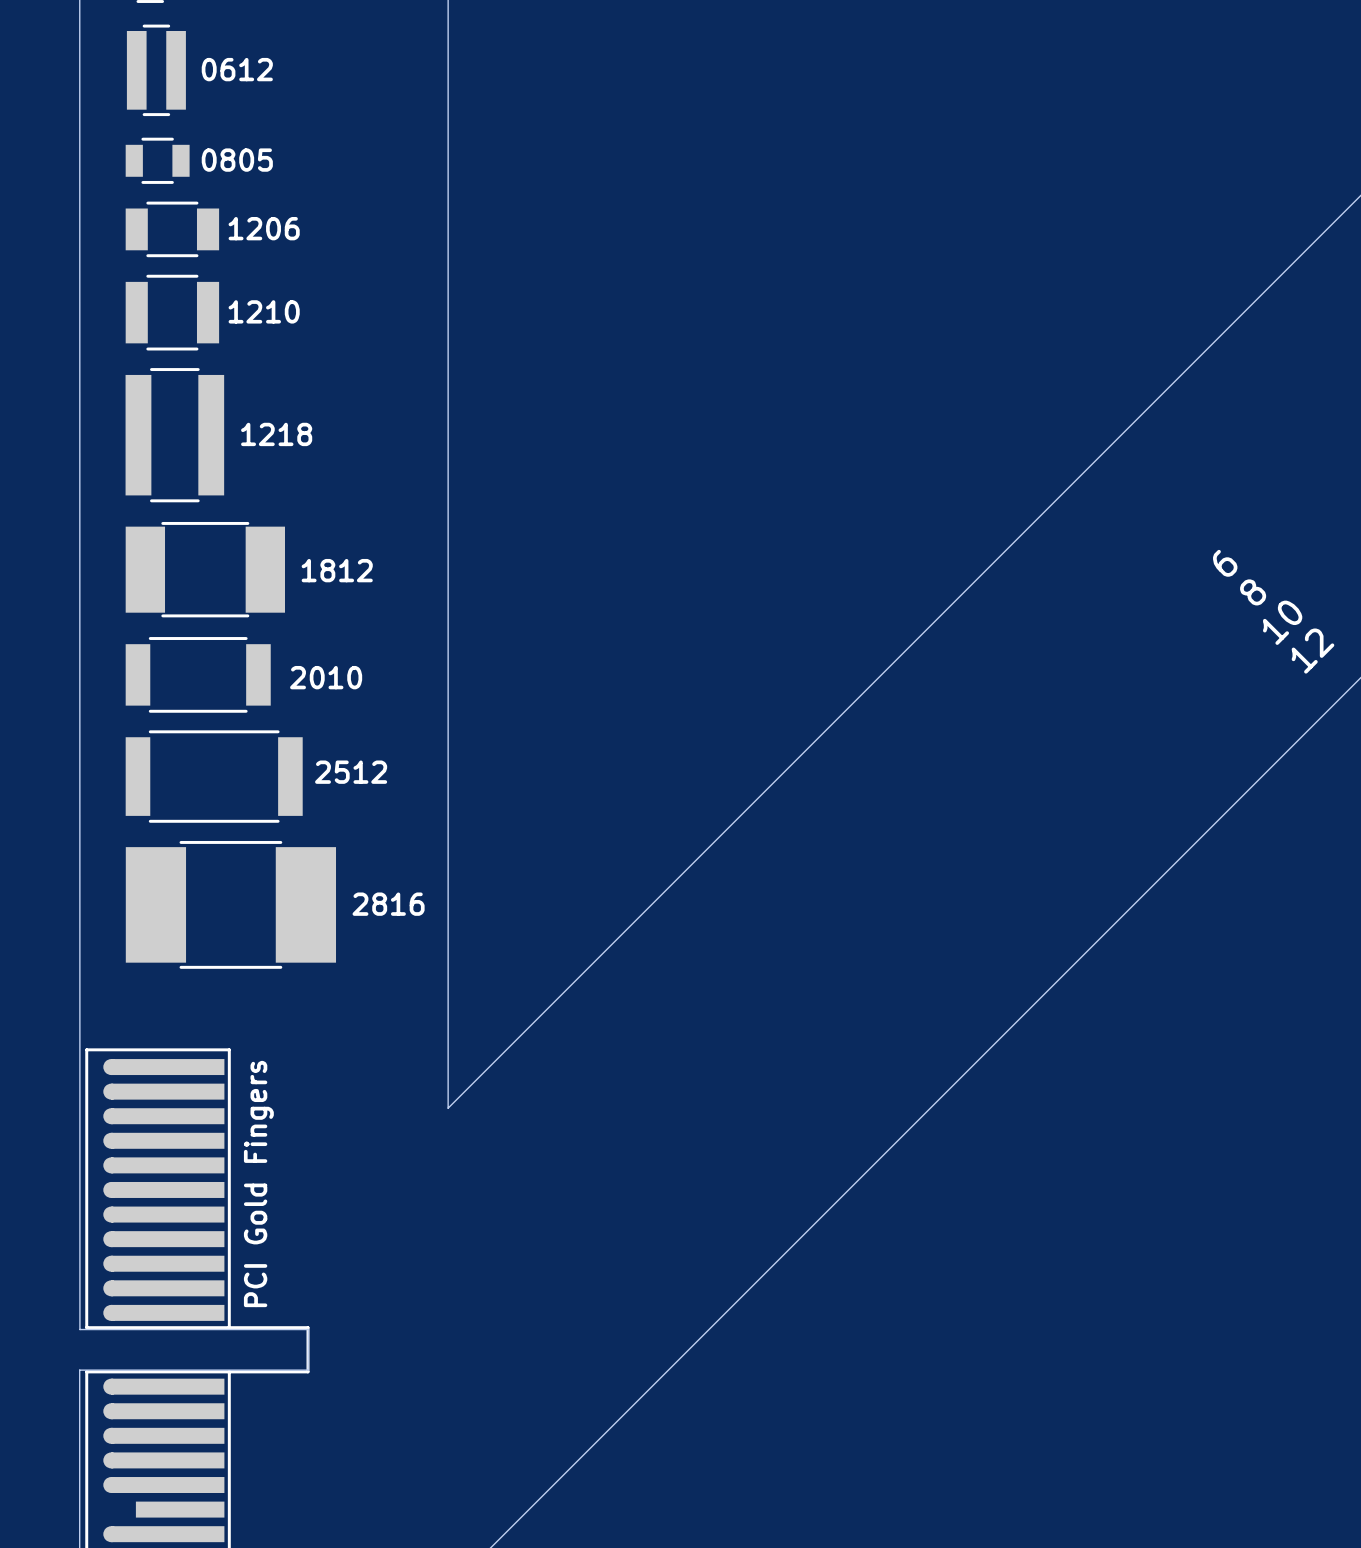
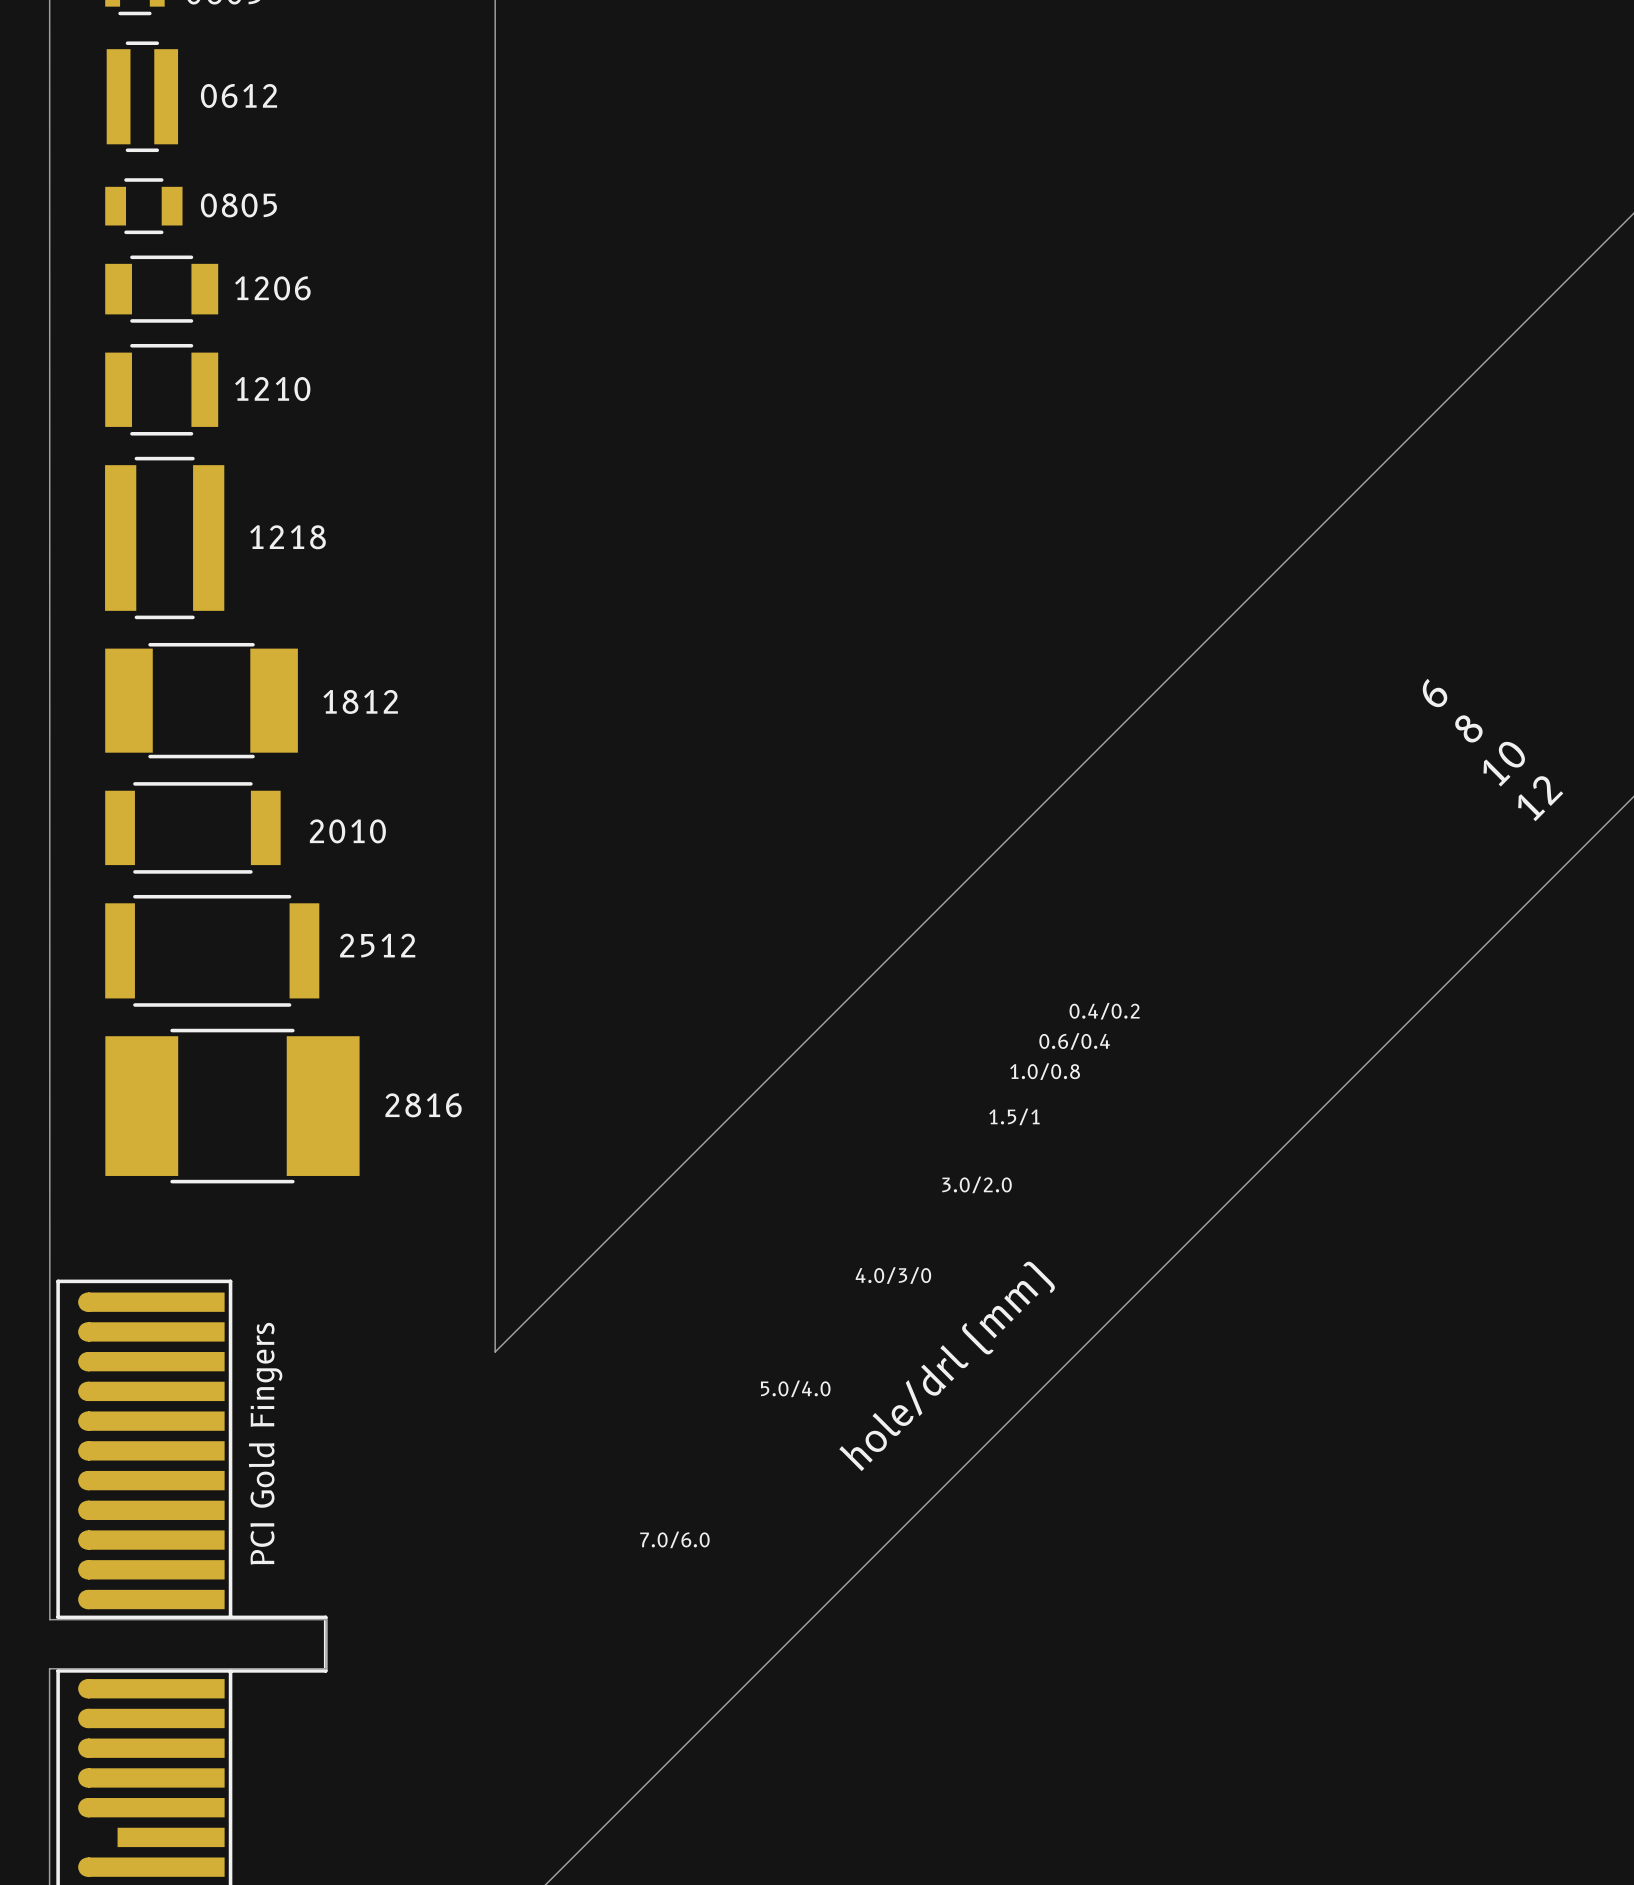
text: none -> 0.4/0.2 (1104, 1011)
text: none -> 0.6/0.4 (1074, 1041)
text: none -> 1.0/0.8 (1045, 1071)
text: none -> 1.5/1 (1014, 1116)
text: none -> 3.0/2.0 (977, 1184)
text: none -> 4.0/3/0 (893, 1275)
text: none -> hole/drl (mm) (947, 1366)
text: none -> 5.0/4.0 (795, 1388)
text: none -> 7.0/6.0 (674, 1539)

